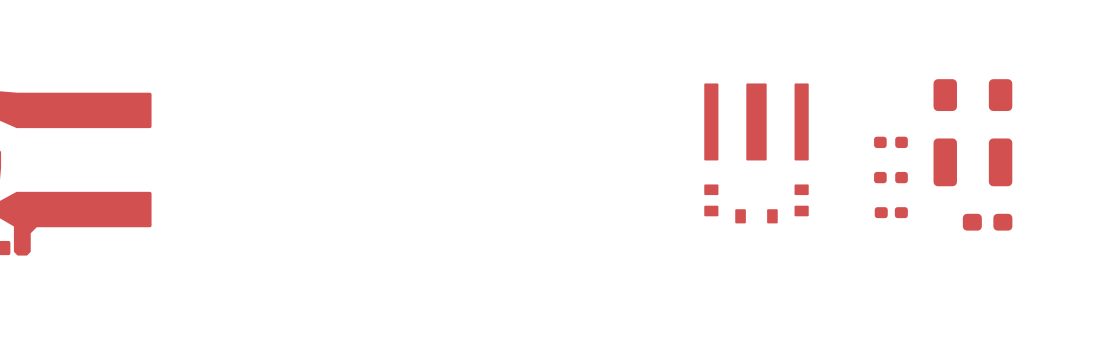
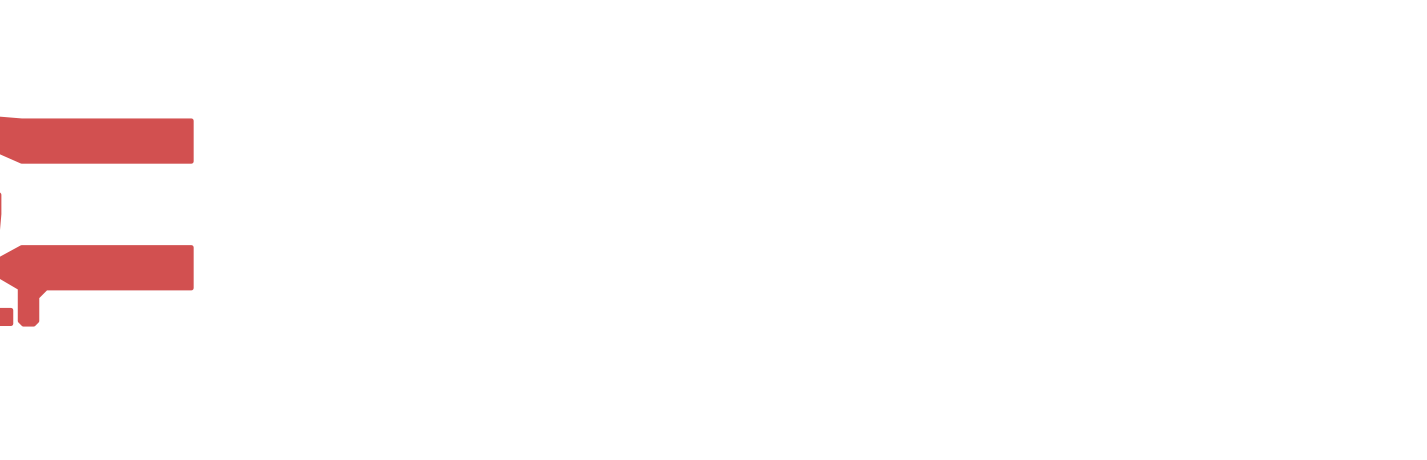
part: (972, 95) -> none
part: (890, 142) -> none
part: (756, 153) -> none
part: (972, 162) -> none
part: (890, 177) -> none
part: (891, 212) -> none
part: (987, 222) -> none

